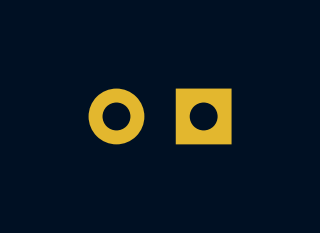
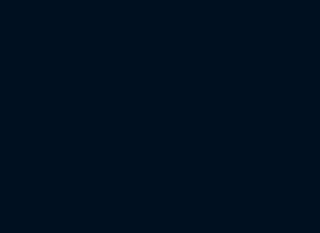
part: (160, 116) -> none

